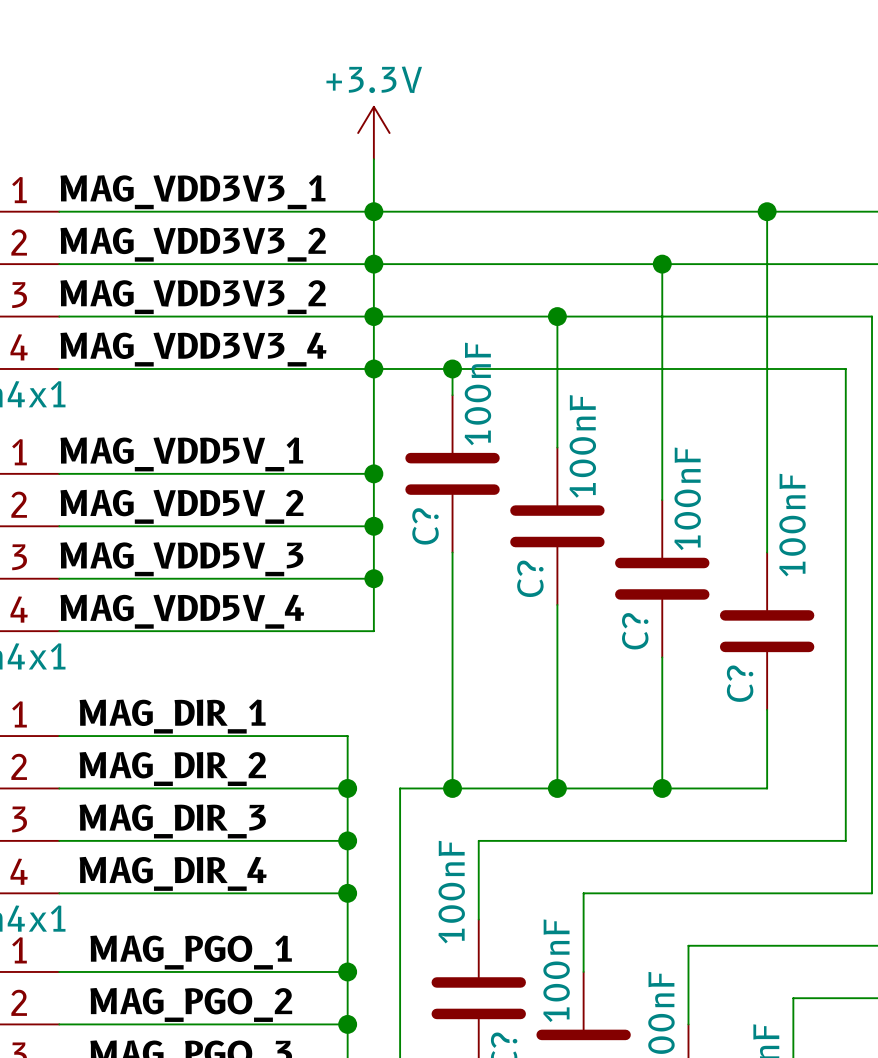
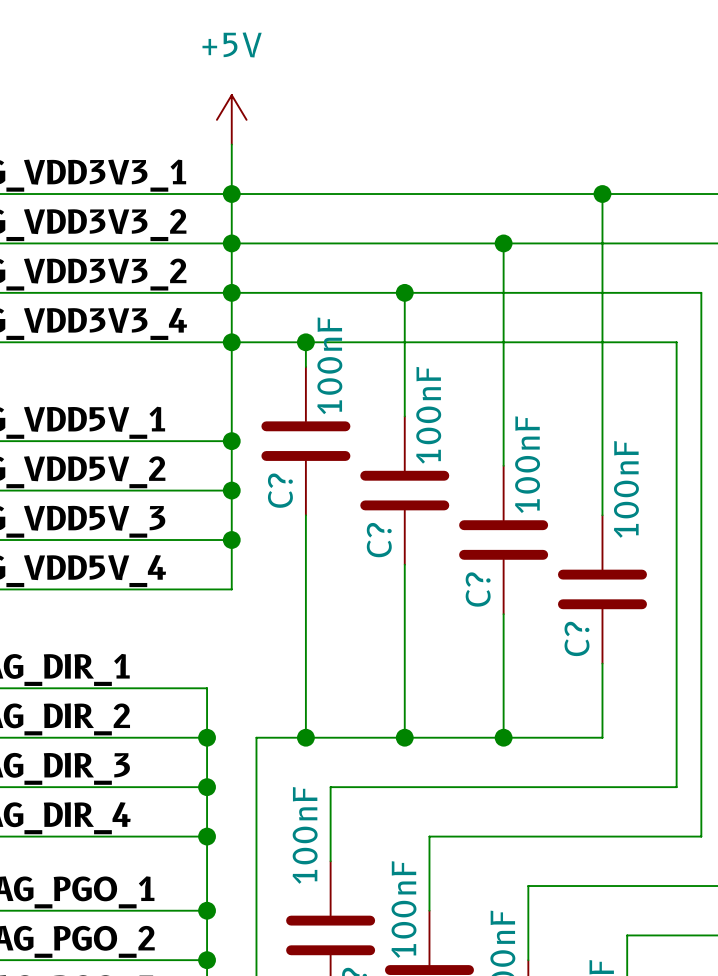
power symbol: +3.3V (373, 133) -> +5V (231, 119)

